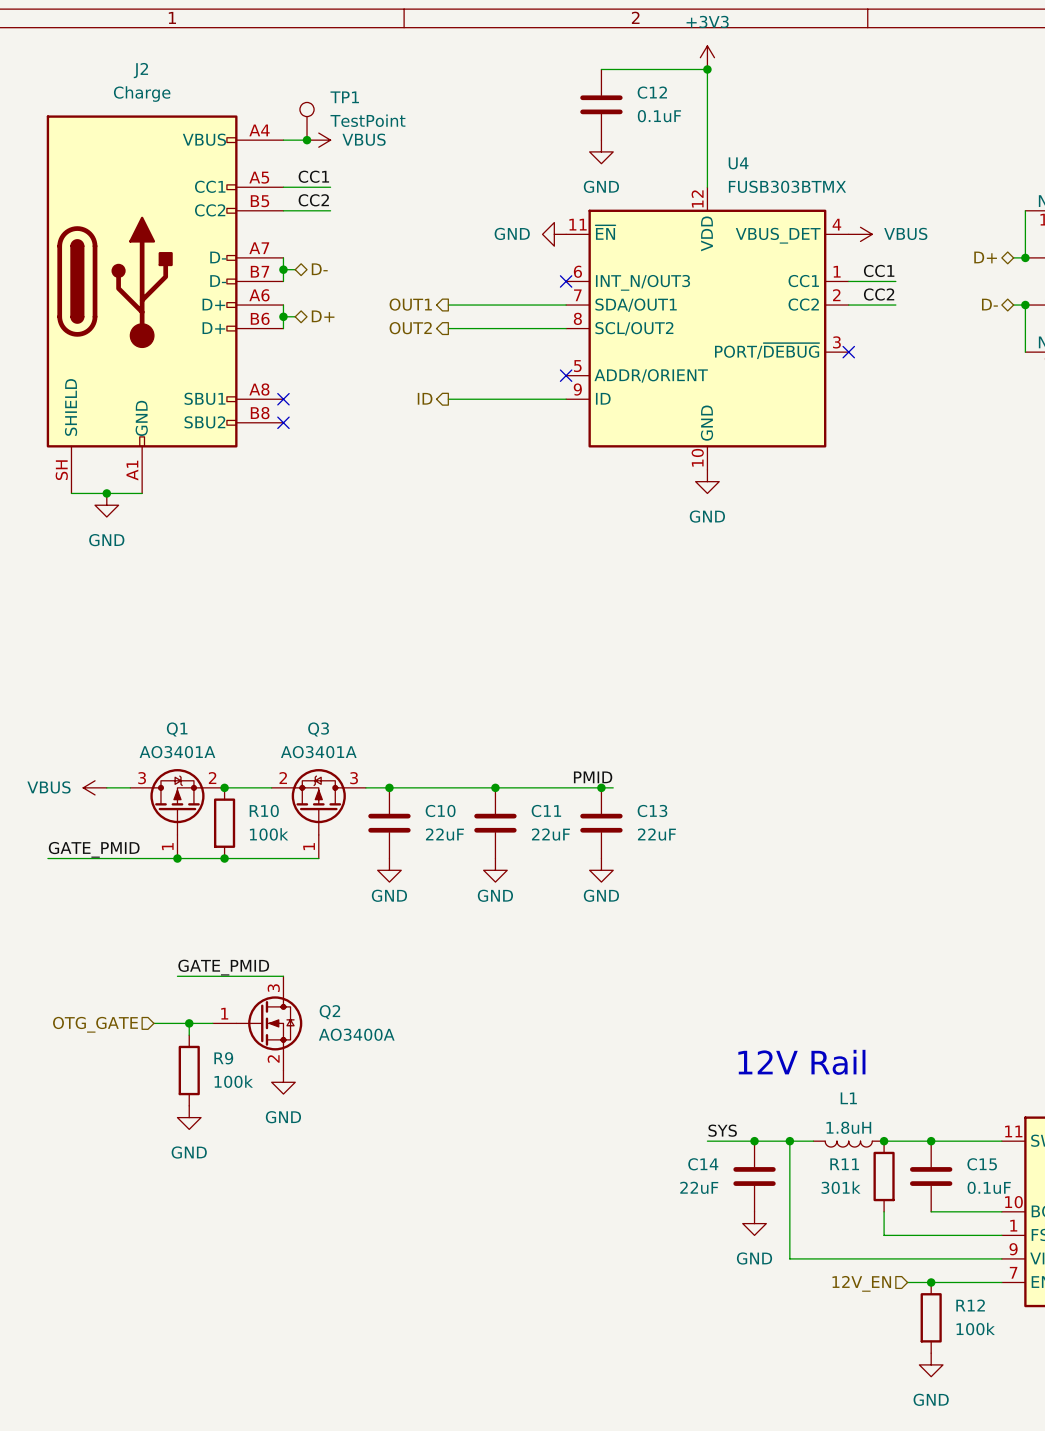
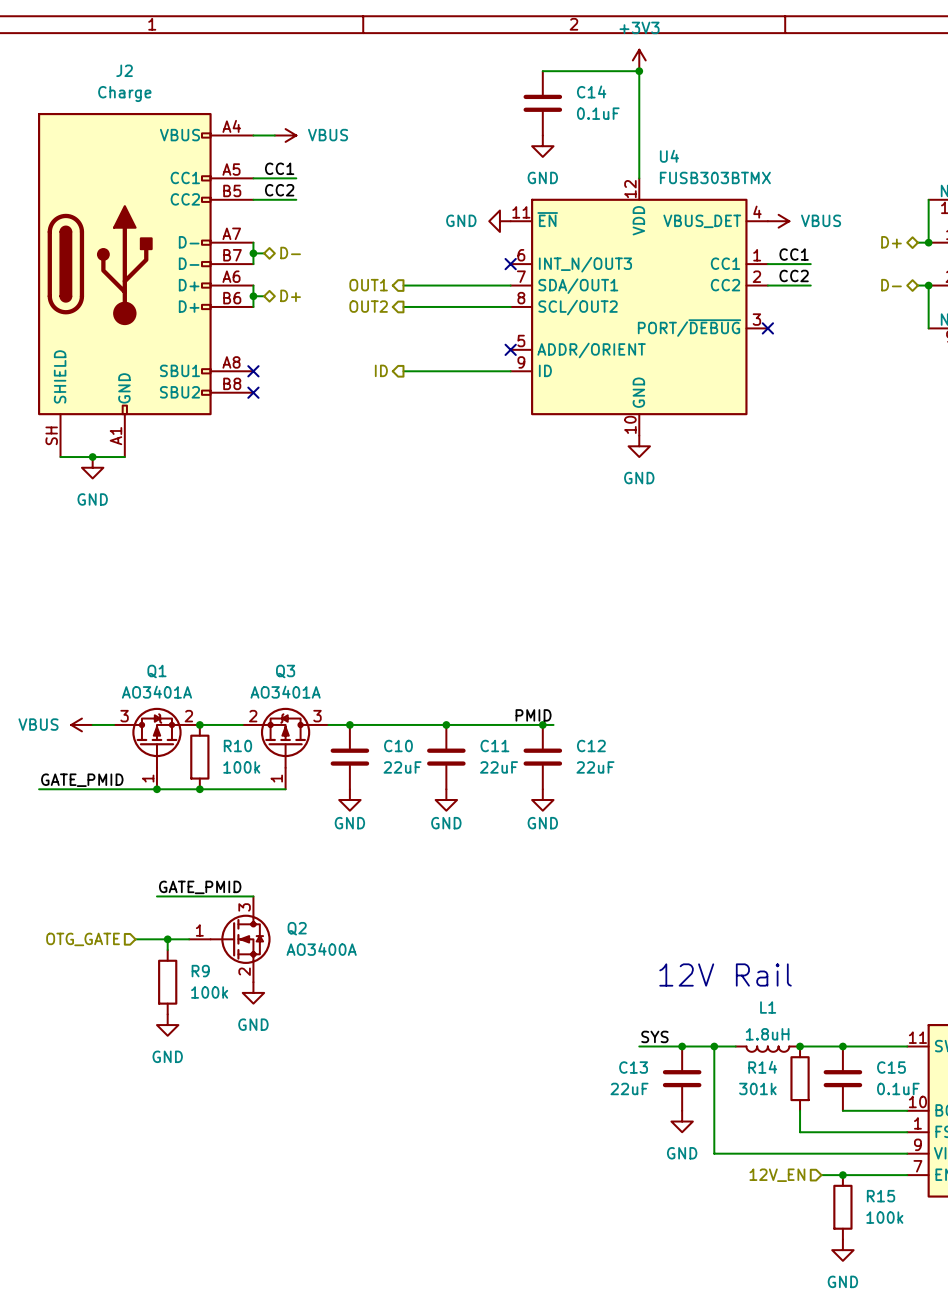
C12 name: C12 (652, 92) -> C14 (591, 91)
TP1: TestPoint (307, 121) -> none
junction: (307, 140) -> none
C13 name: C13 (652, 810) -> C12 (591, 746)
C14 name: C14 (703, 1164) -> C13 (633, 1067)
R11 name: R11 (844, 1164) -> R14 (762, 1067)
R12 name: R12 (970, 1305) -> R15 (881, 1196)

